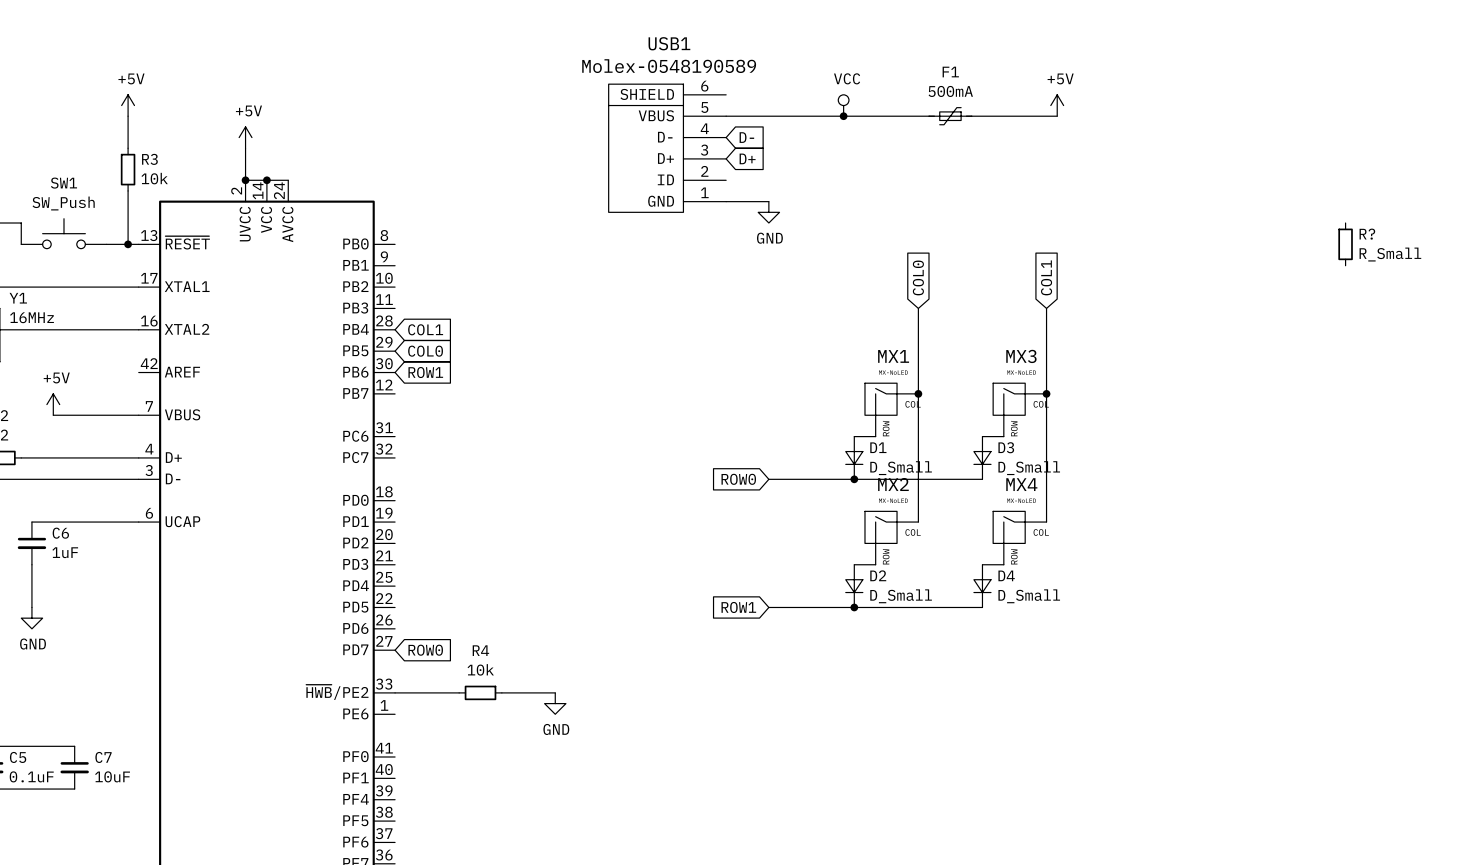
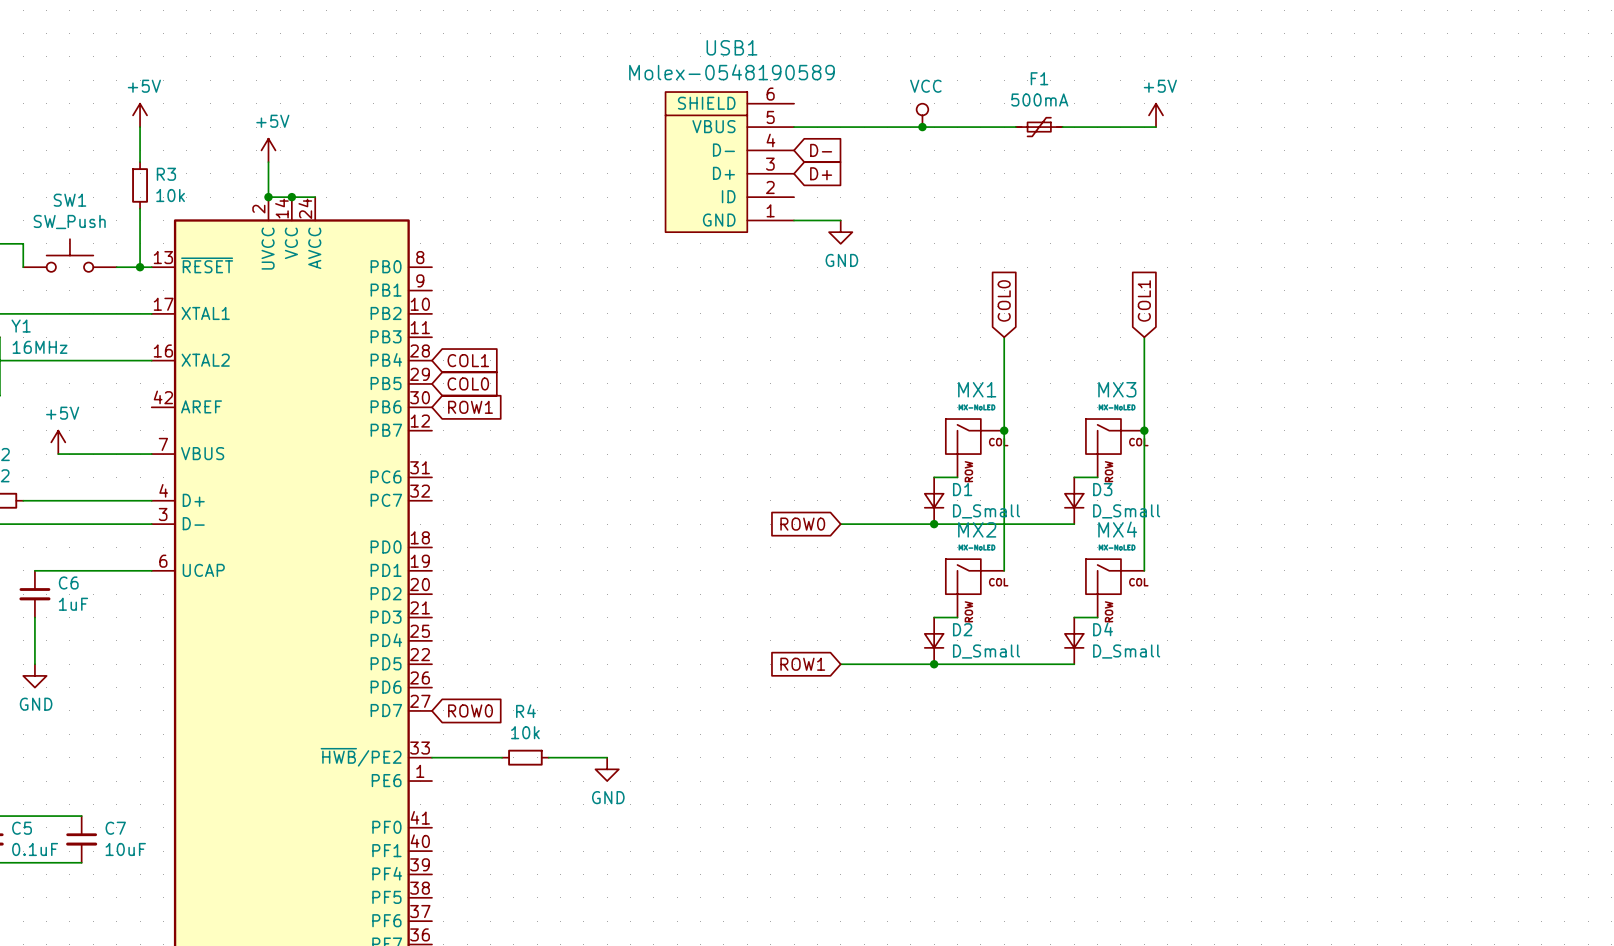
R?: R_Small (1345, 244) -> none

